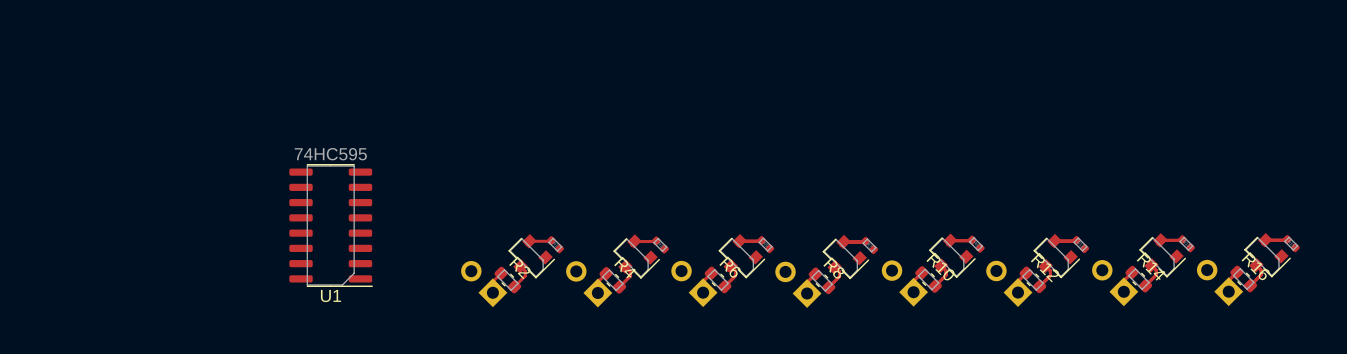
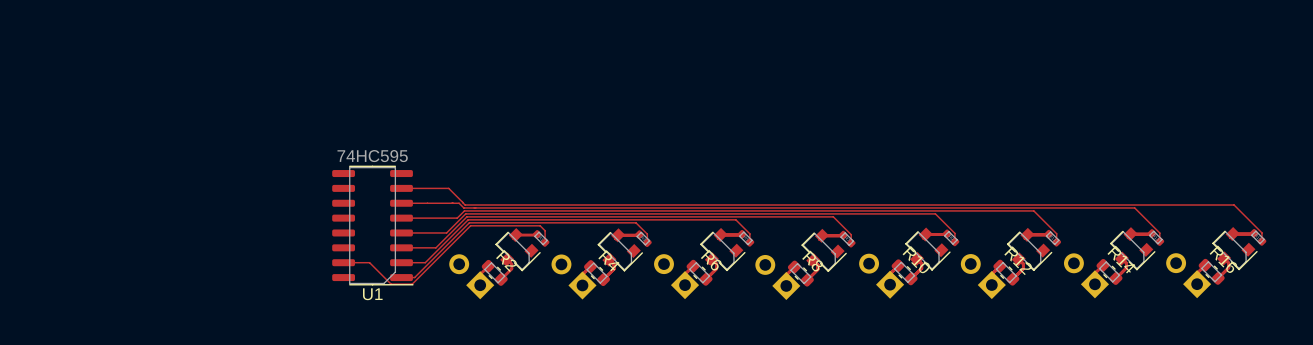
track: none -> (401, 188) (448, 188) (465, 205) (1234, 205) (1261, 232) (1261, 241)
track: none -> (401, 203) (459, 203) (463, 207) (1134, 207) (1159, 233) (1159, 241)
track: none -> (401, 218) (457, 218) (464, 210) (1033, 210) (1056, 233) (1056, 242)
U1 position: (331, 225) -> (372, 225)
track: none -> (401, 232) (446, 232) (465, 213) (935, 213) (954, 233) (954, 241)
track: none -> (545, 242) (545, 230) (540, 225) (470, 225) (412, 284) (390, 284) (369, 262) (343, 262)
track: none -> (749, 242) (749, 233) (735, 219) (468, 219) (425, 262) (401, 262)
track: none -> (647, 242) (647, 234) (635, 222) (469, 222) (414, 277) (401, 277)
track: none -> (851, 243) (851, 234) (833, 216) (466, 216) (435, 247) (401, 247)

